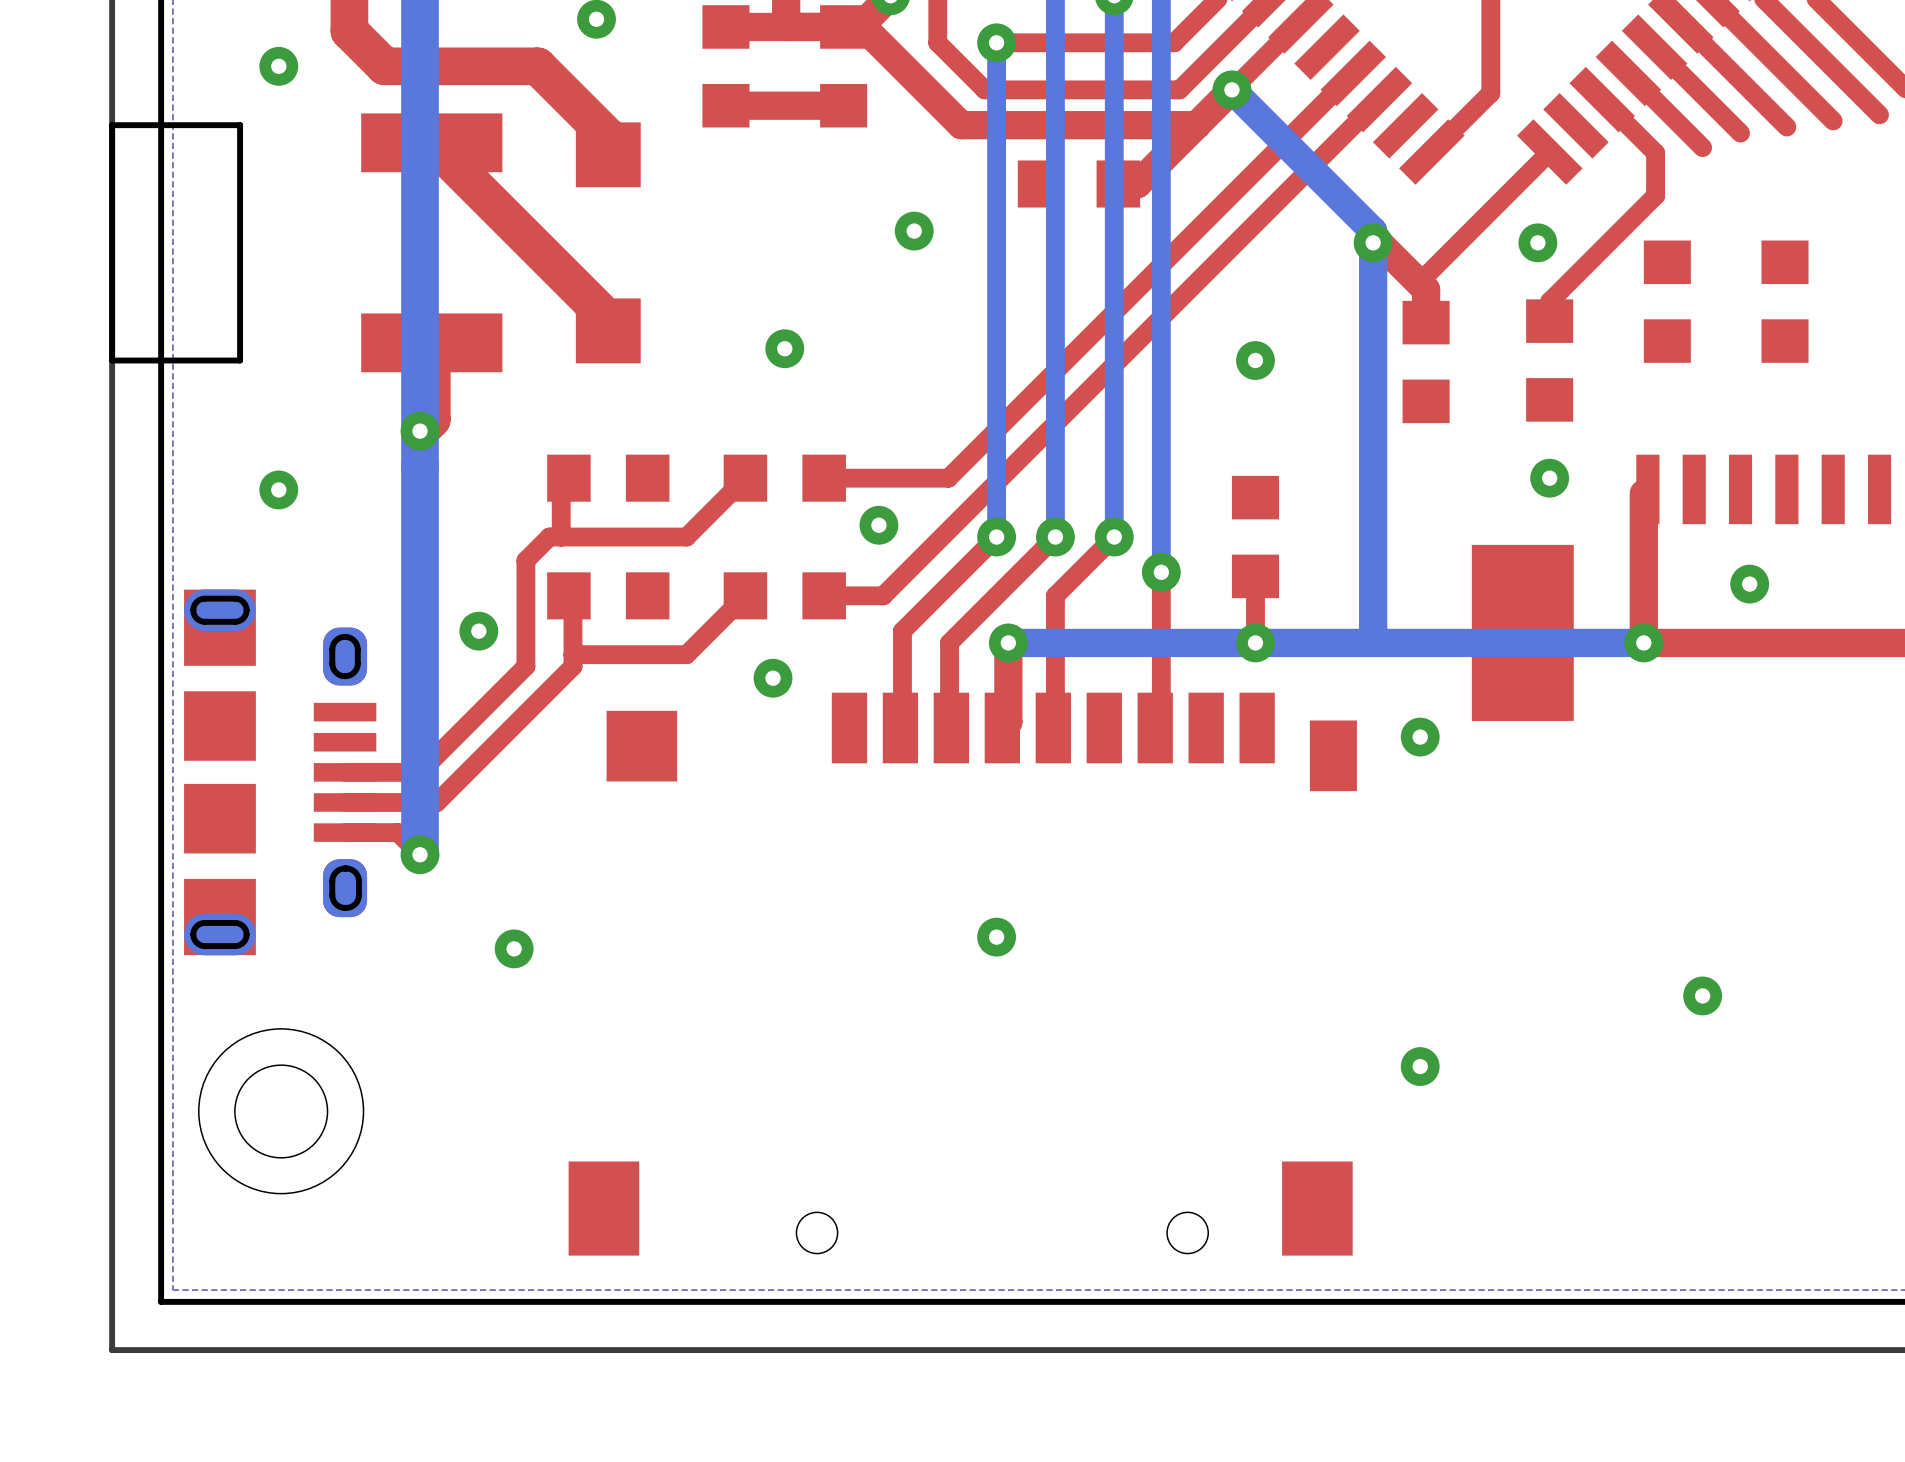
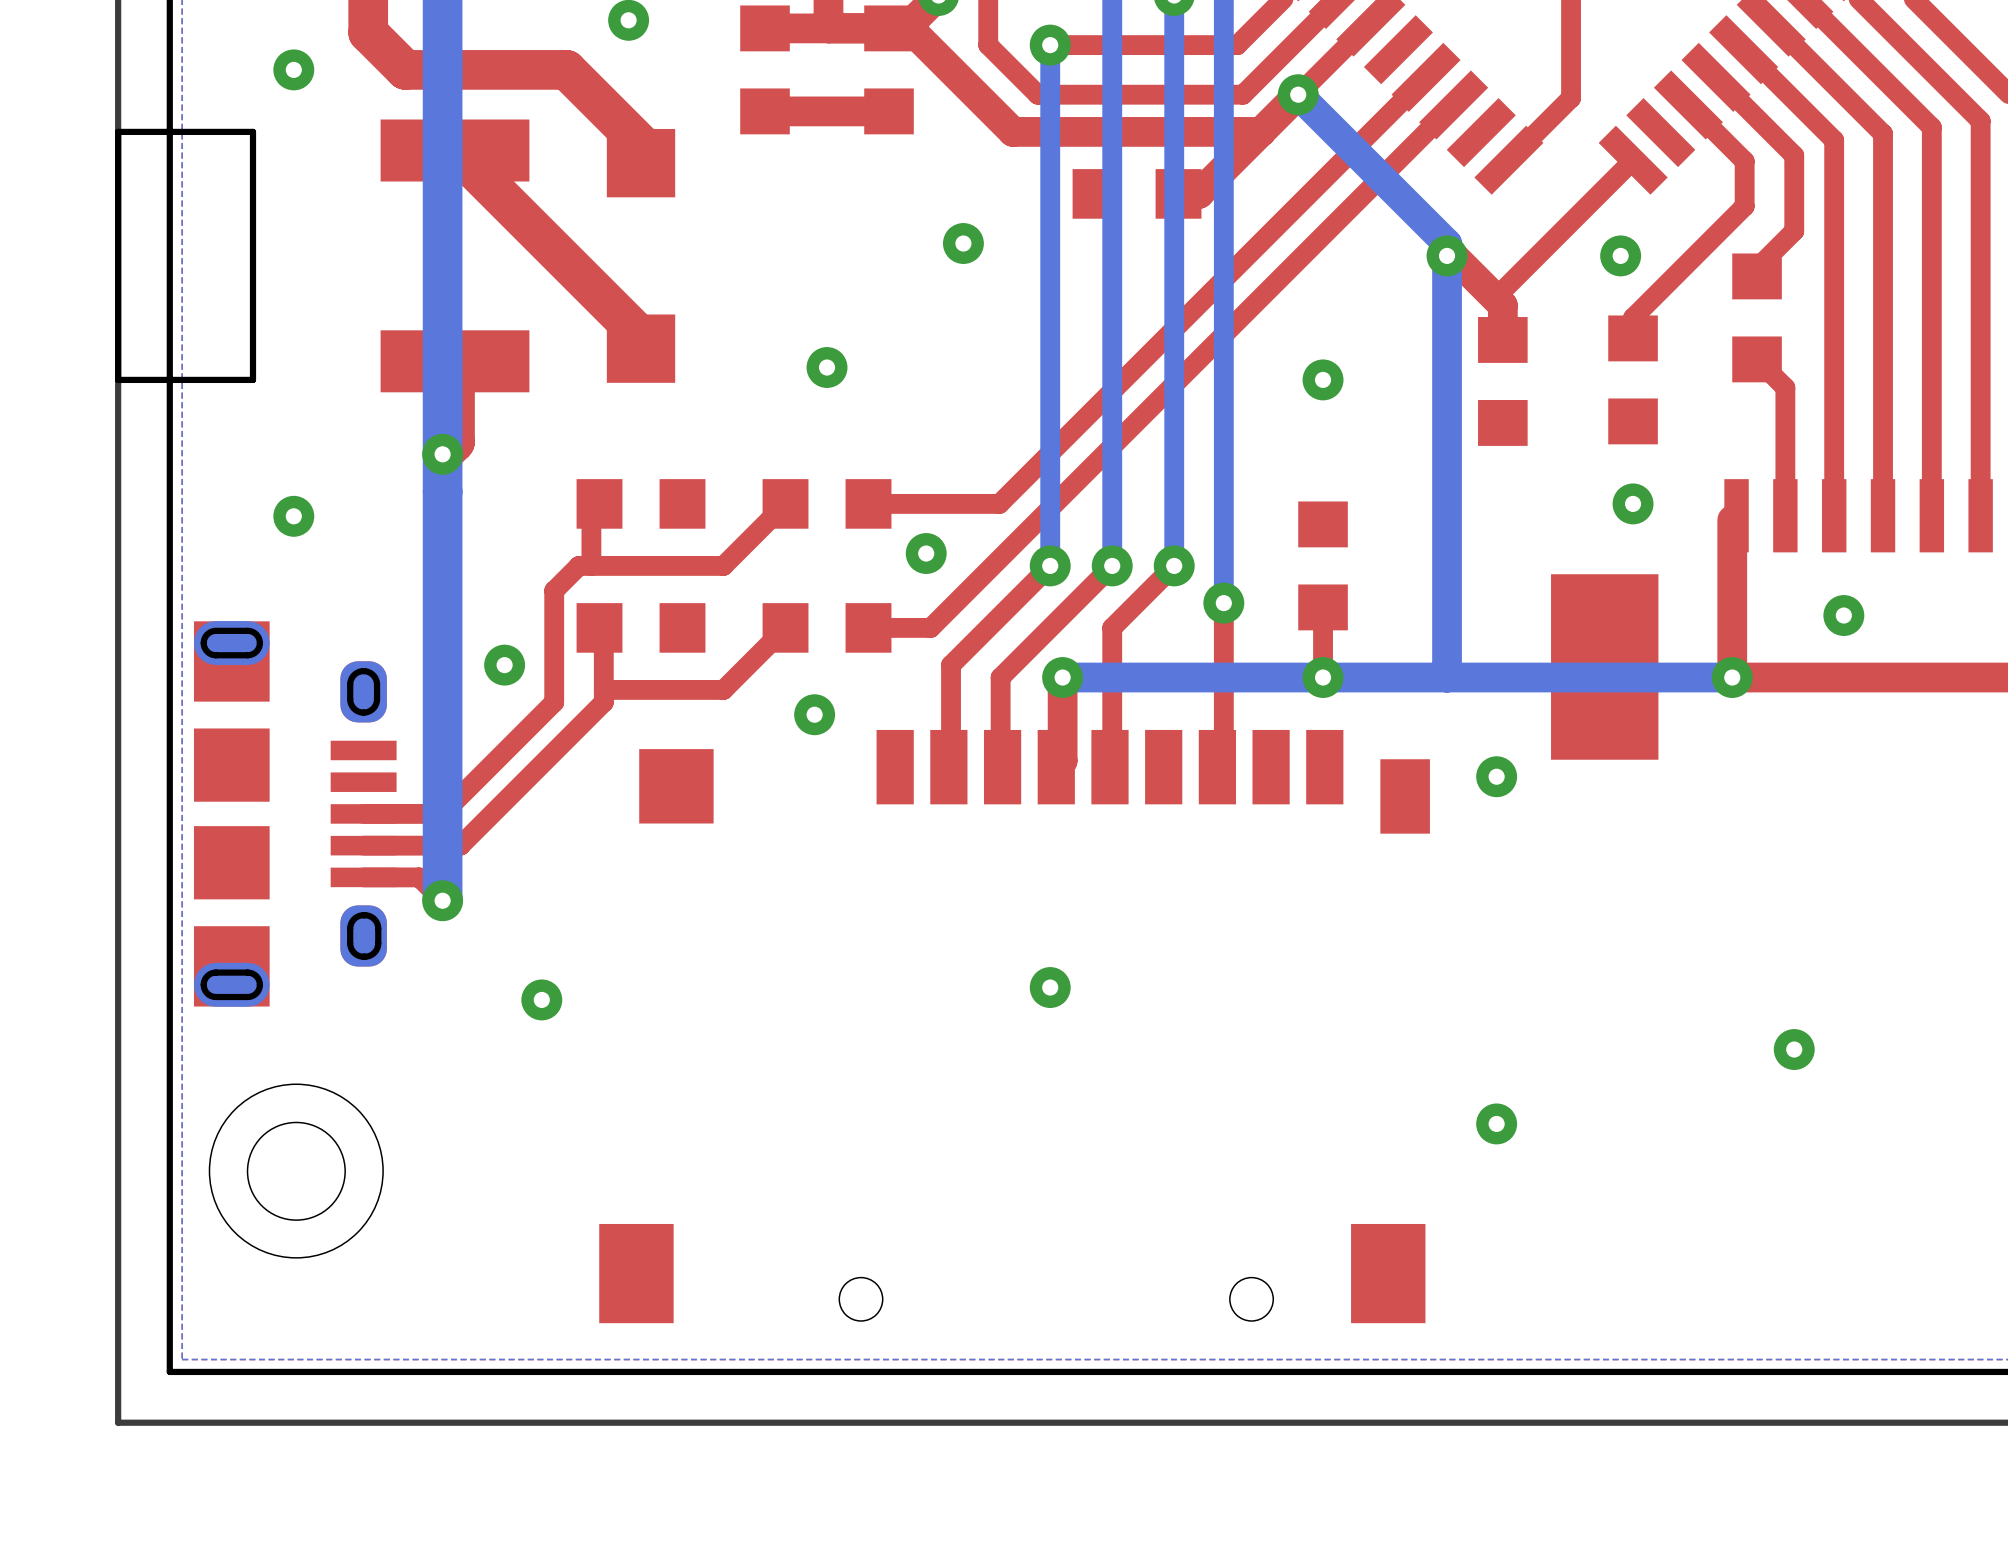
top track: none -> (1980, 121) (1980, 515)
top track: none -> (1931, 127) (1931, 515)
top track: none -> (1883, 133) (1883, 515)
top track: none -> (1834, 140) (1834, 515)
top track: none -> (1794, 155) (1794, 231) (1757, 268) (1757, 276)
part: (1785, 301) -> none
top track: none -> (1757, 359) (1785, 387) (1785, 515)

